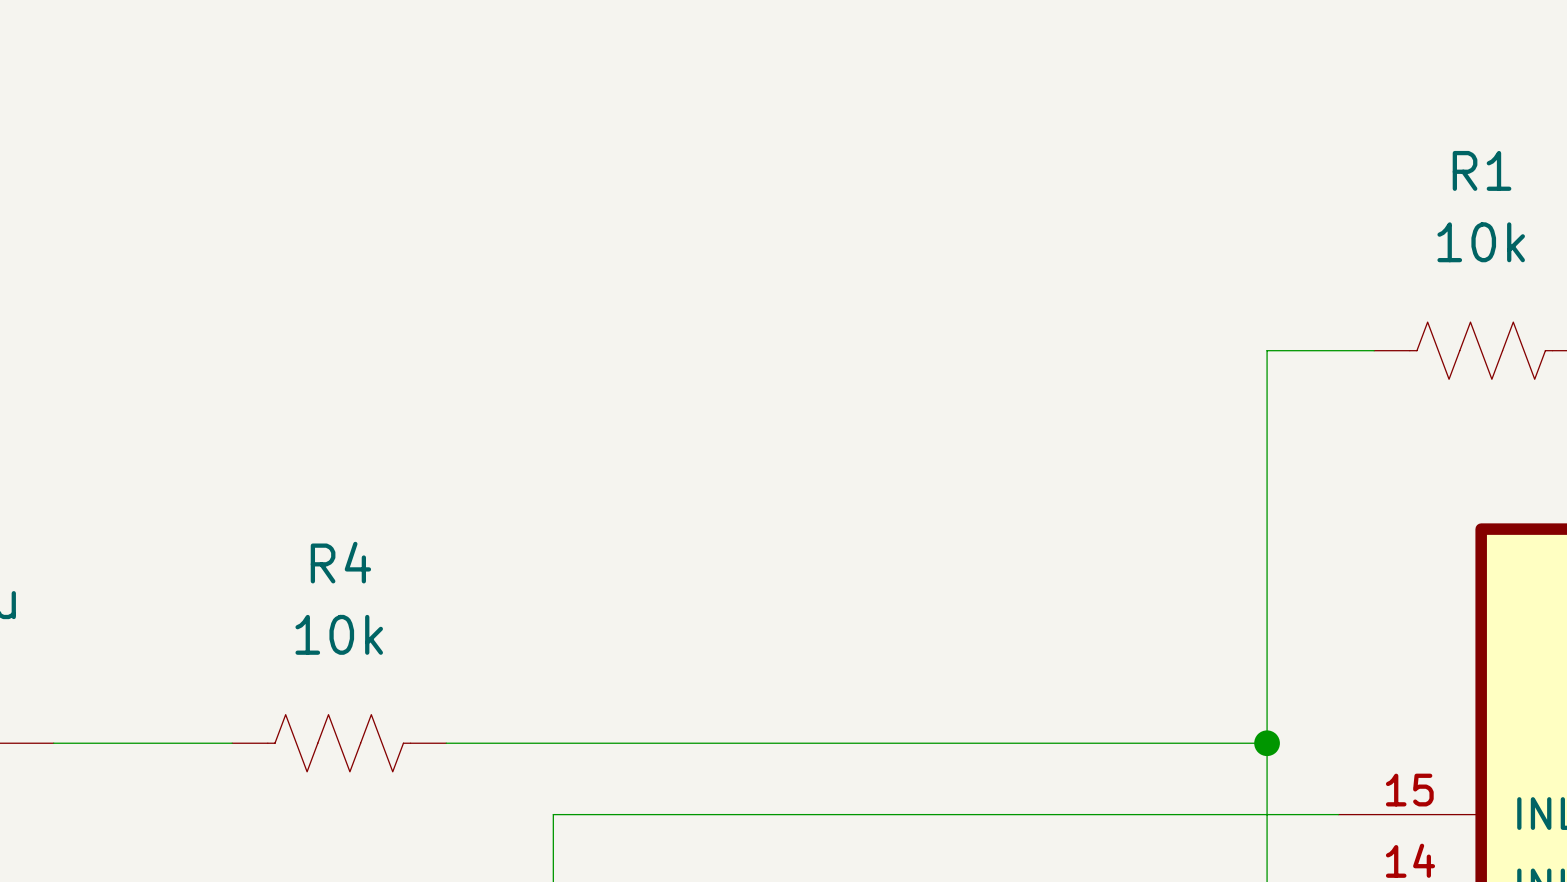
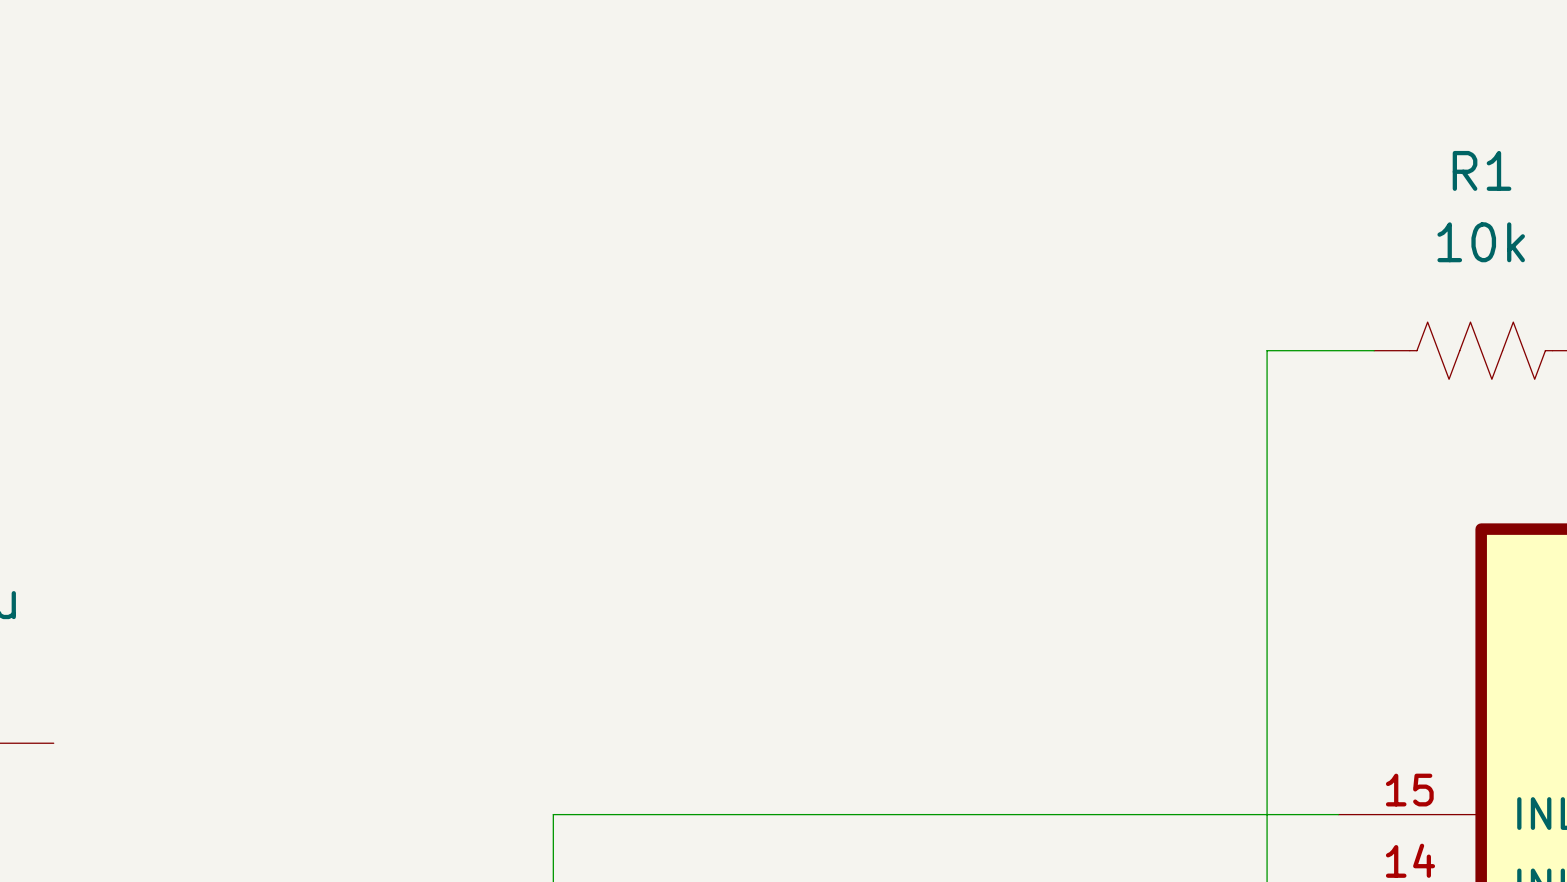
wire: (53, 743) (232, 743) -> none
R4: 10k (339, 743) -> none
wire: (446, 743) (1267, 743) -> none
junction: (1267, 743) -> none

